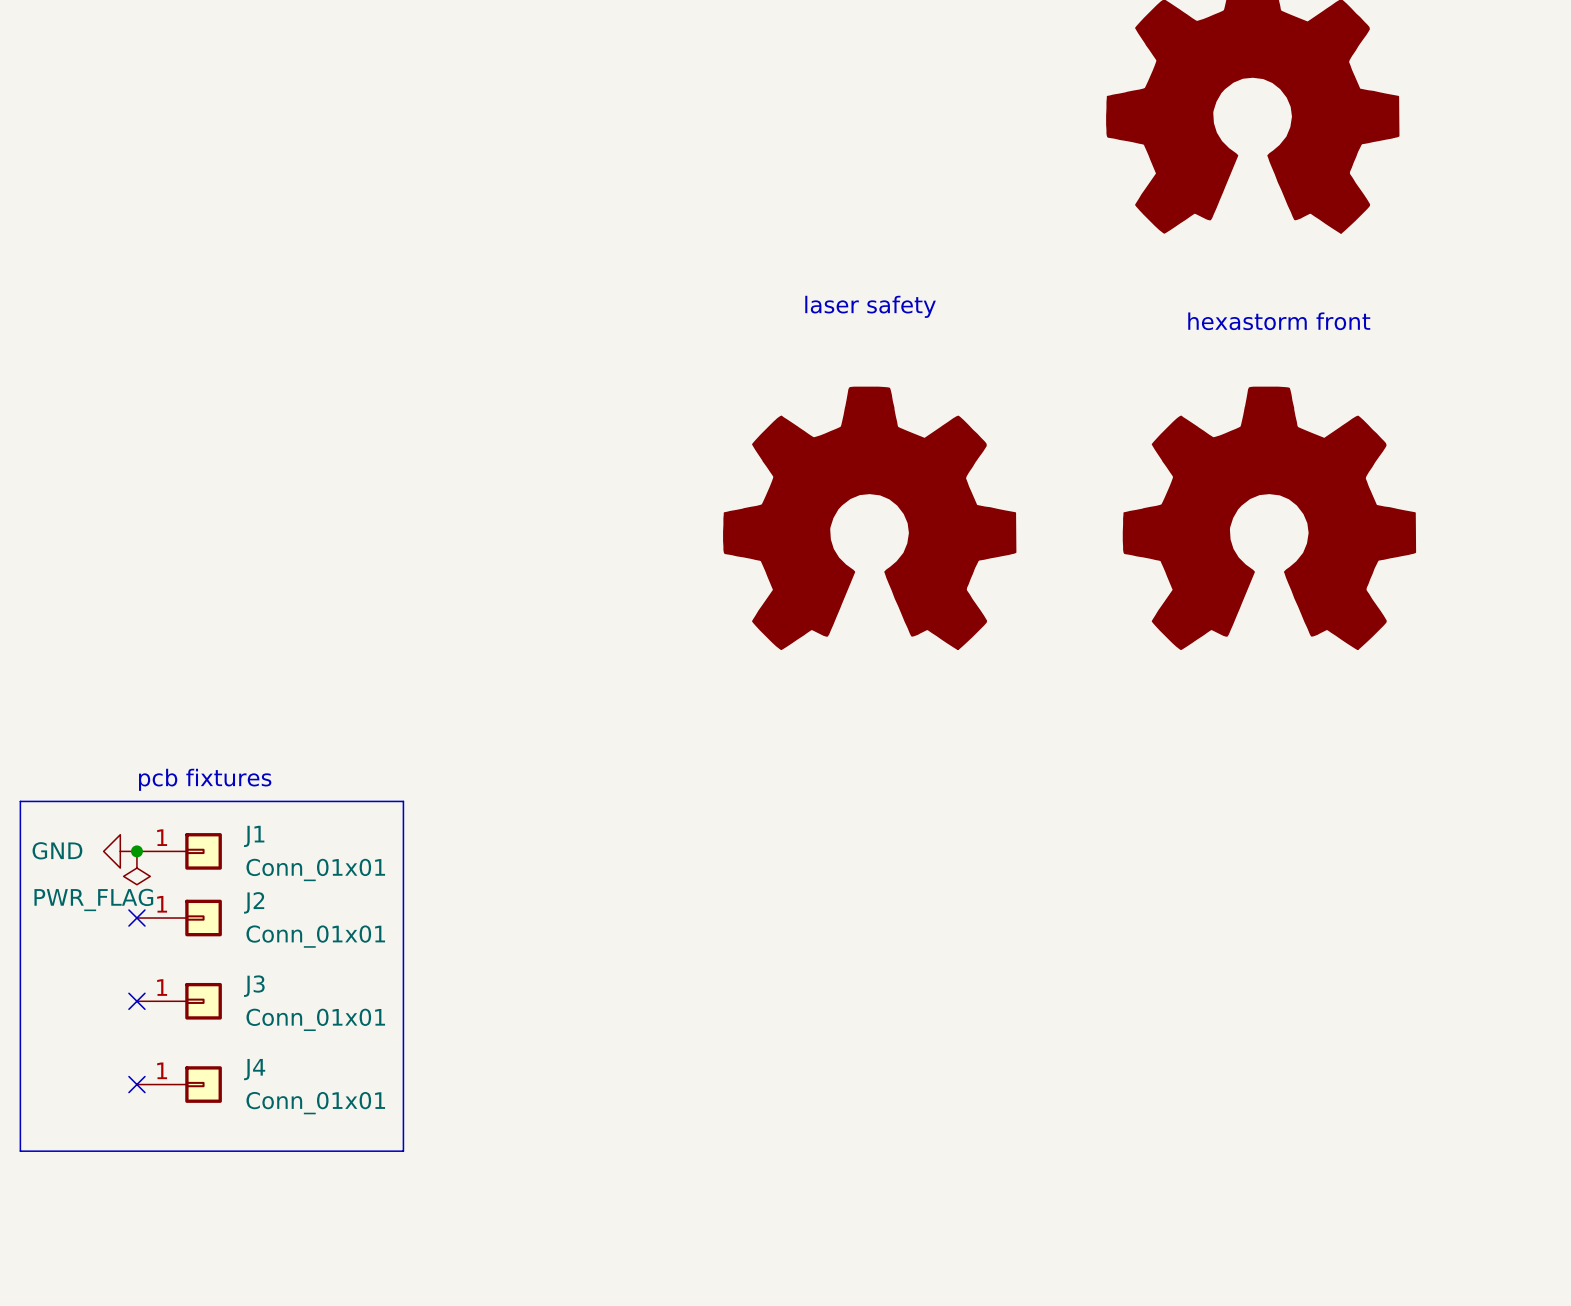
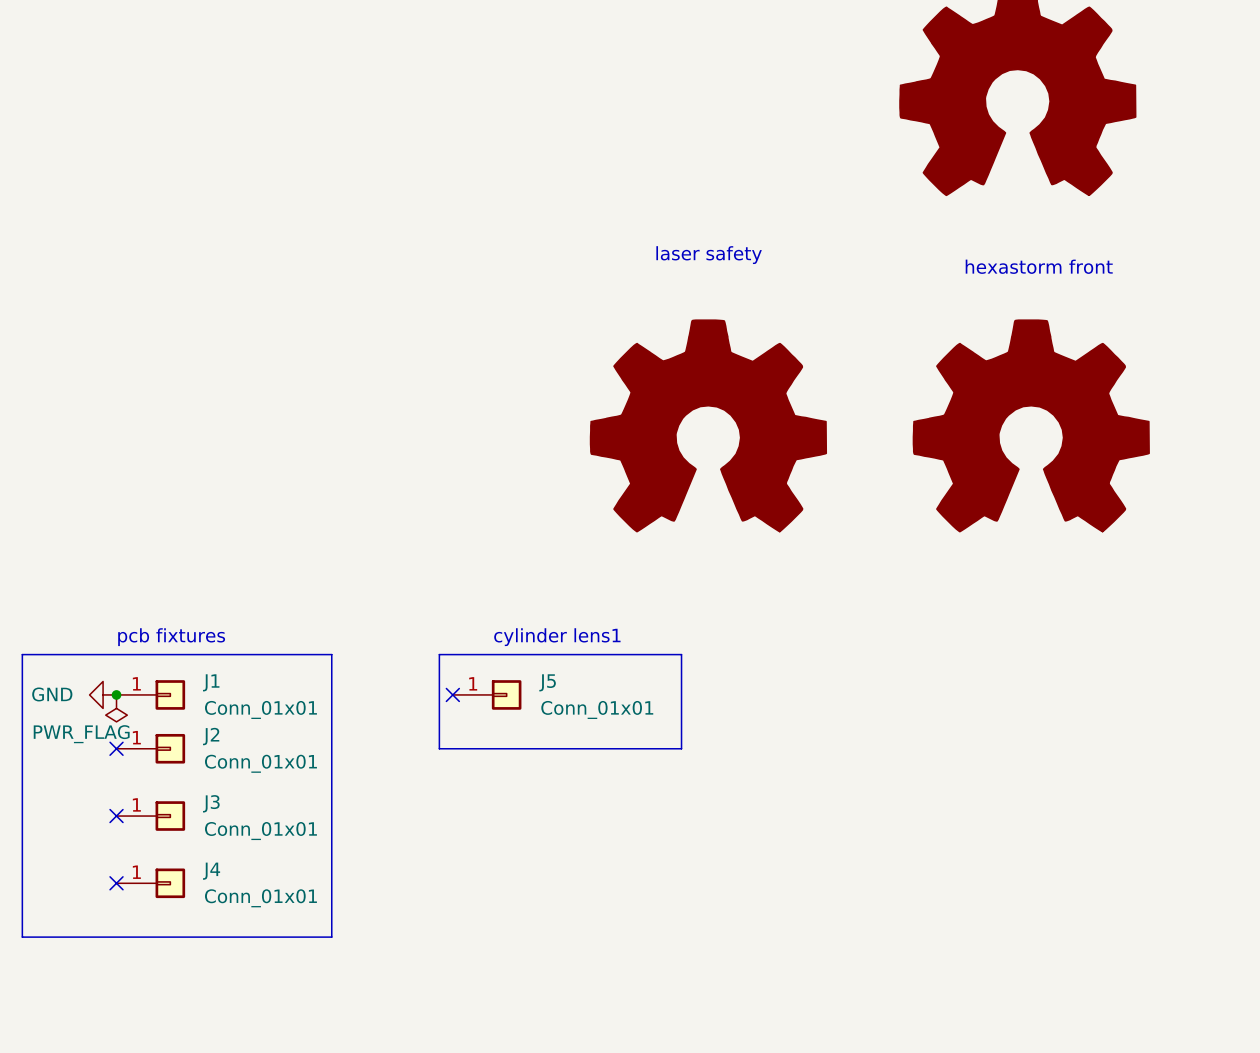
text: none -> cylinder lens1 (557, 637)
line: none -> (439, 654) (439, 748) (681, 748) (681, 654) (439, 654)
no-connect mark: none -> (452, 694)
J5: none -> Conn_01x01 (487, 694)

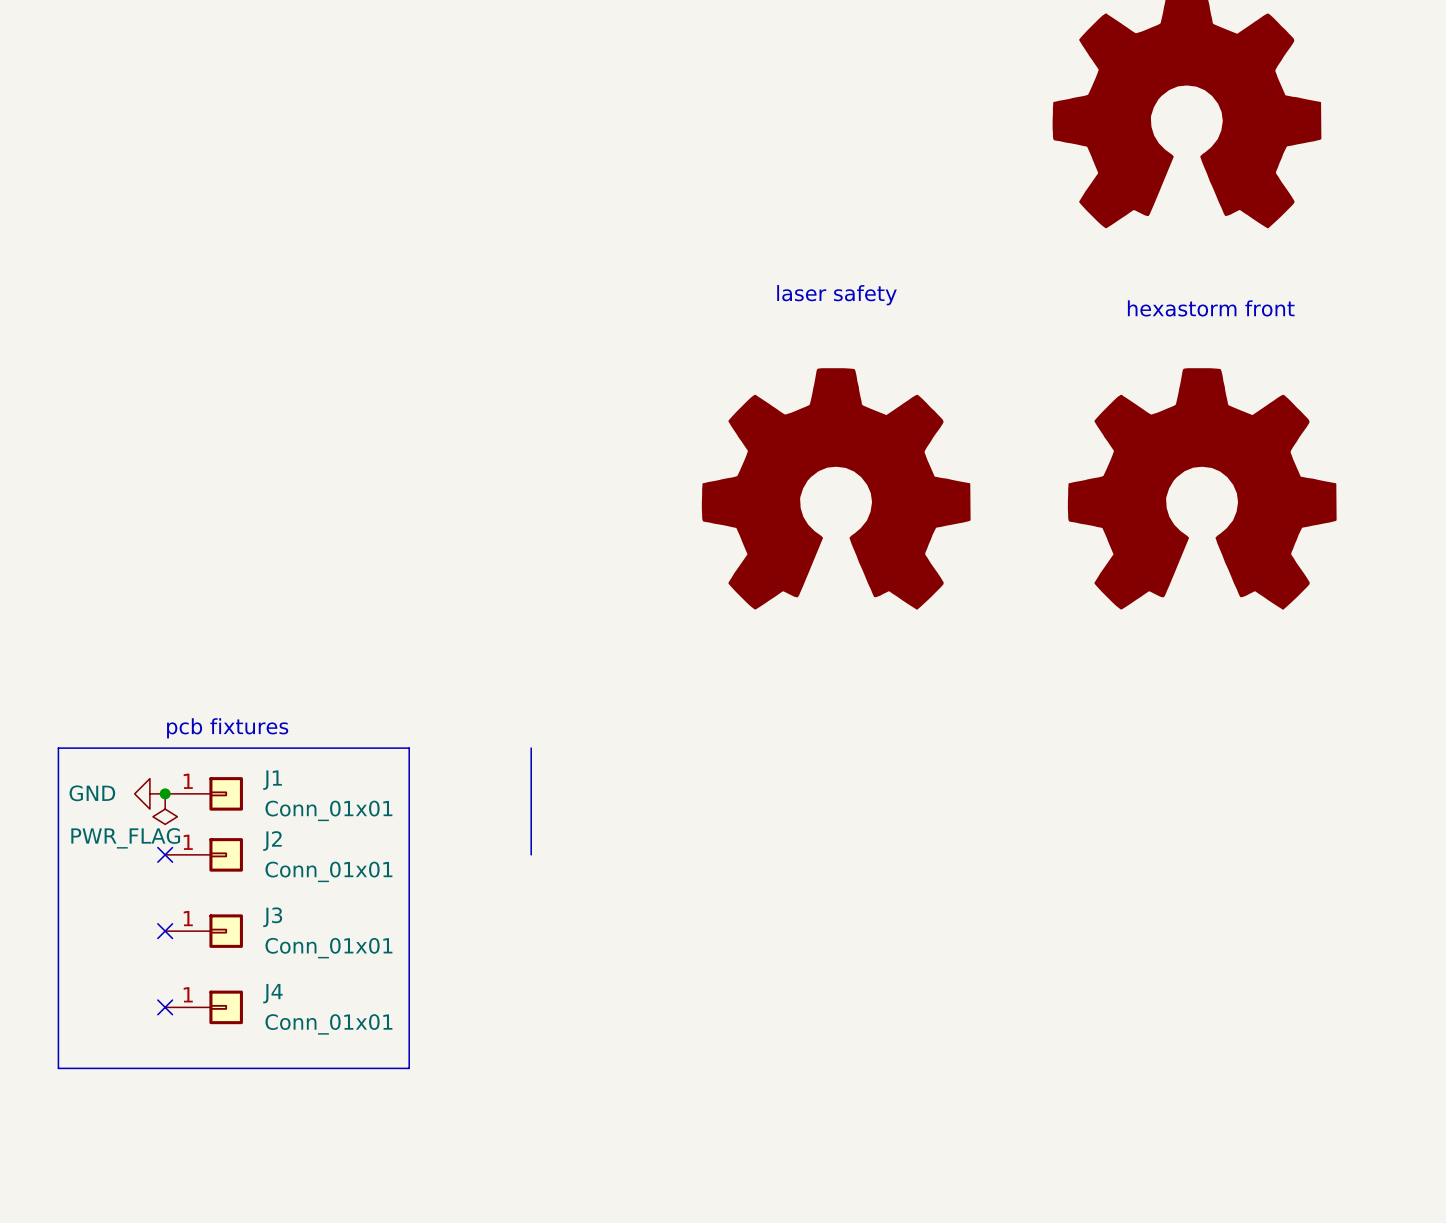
text: cylinder lens1 (557, 637) -> none
line: (439, 654) (681, 654) (681, 748) (439, 748) -> none
no-connect mark: (452, 694) -> none
J5: Conn_01x01 (487, 694) -> none

